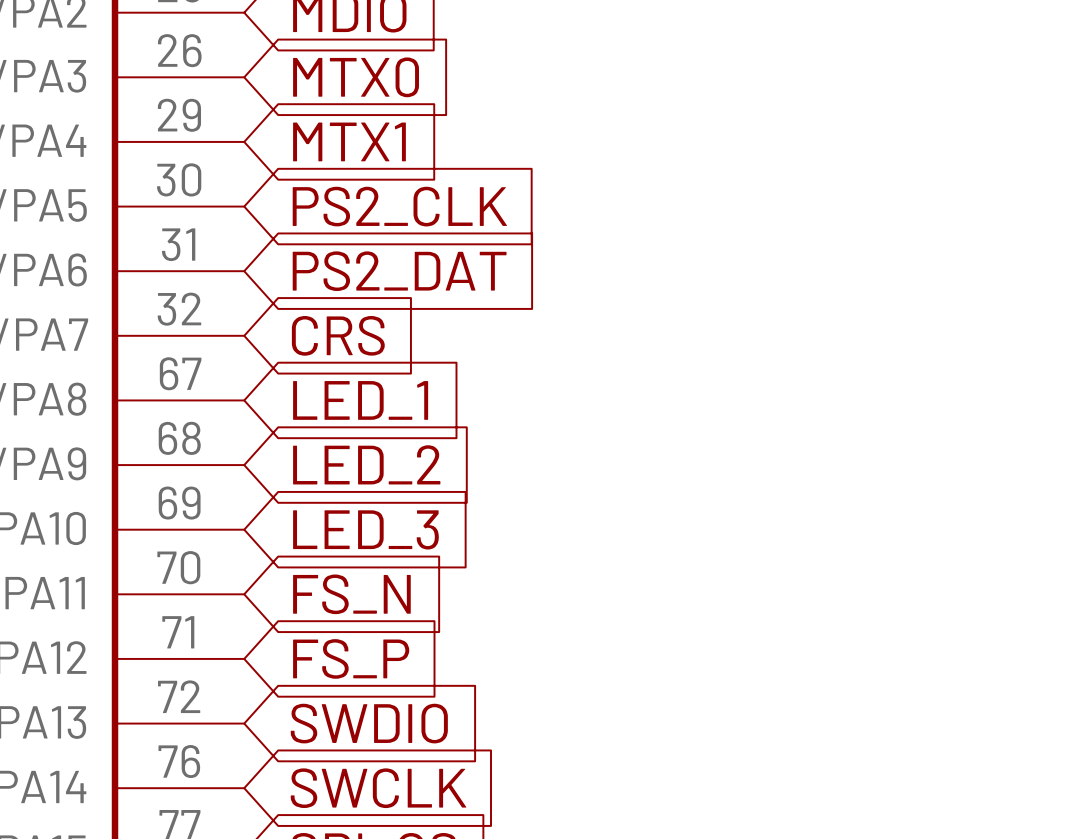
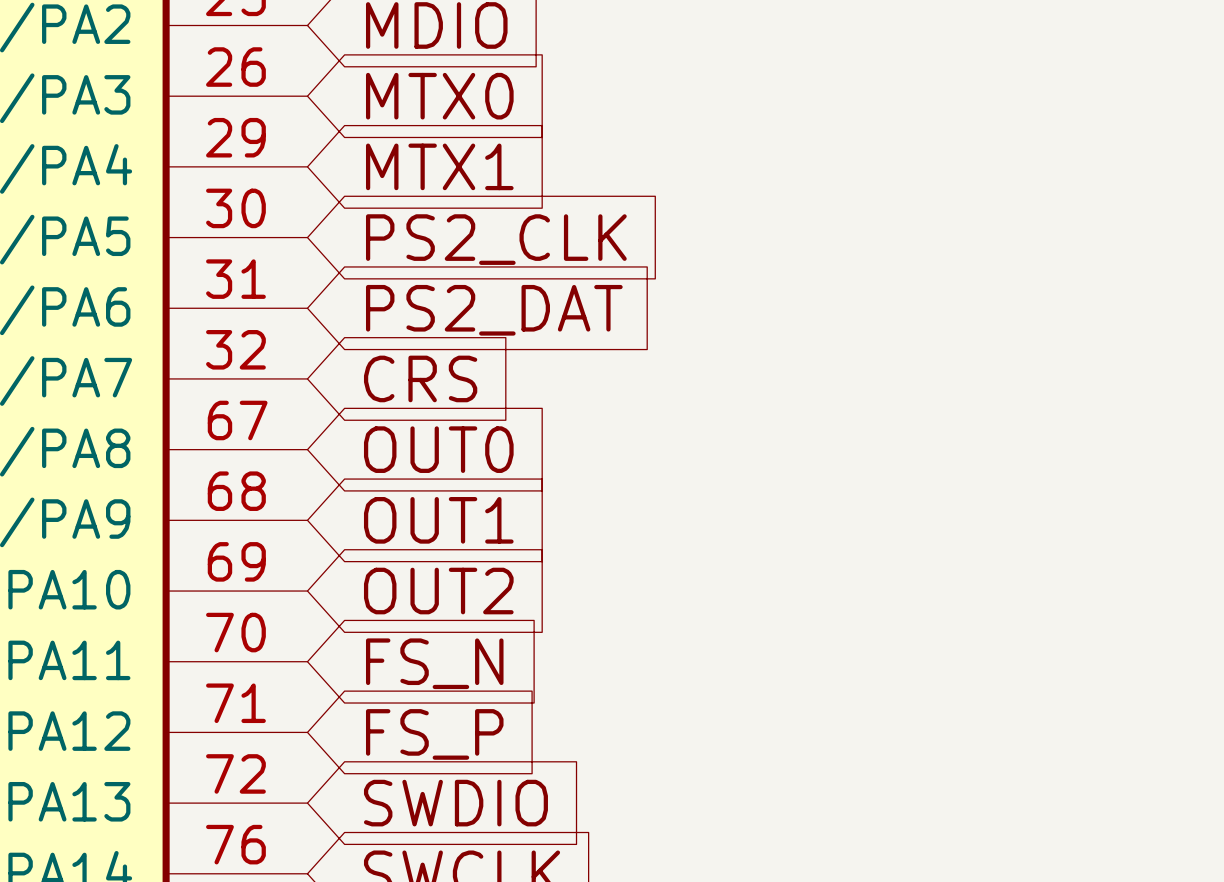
global label: LED_1 (360, 400) -> OUT0 (438, 449)
global label: LED_2 (366, 464) -> OUT1 (438, 520)
global label: LED_3 (365, 529) -> OUT2 (438, 591)

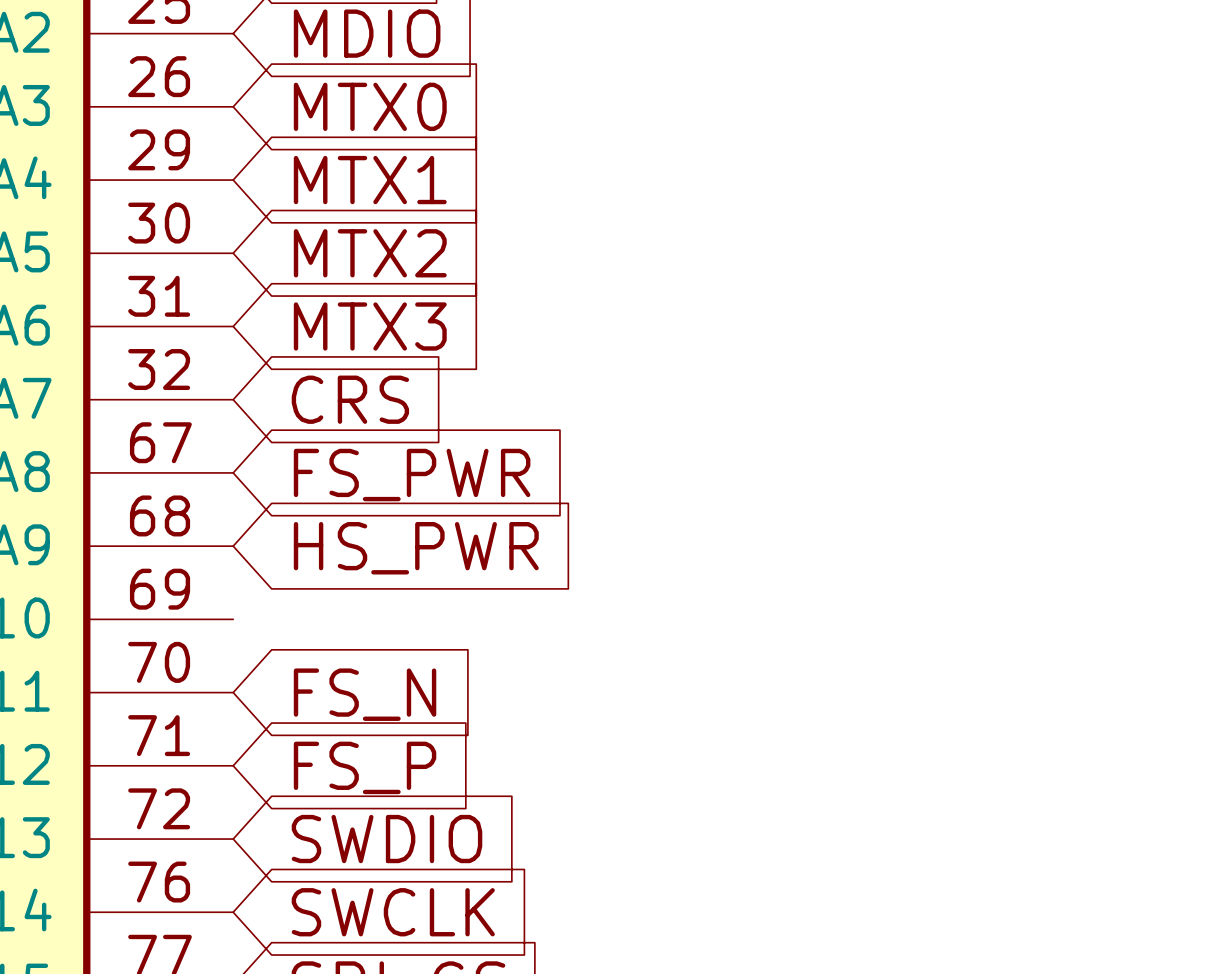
global label: PS2_CLK (496, 239) -> MTX2 (370, 253)
global label: PS2_DAT (494, 310) -> MTX3 (370, 326)
global label: OUT0 (438, 449) -> FS_PWR (412, 475)
global label: OUT1 (438, 520) -> HS_PWR (416, 548)
global label: OUT2 (438, 591) -> none

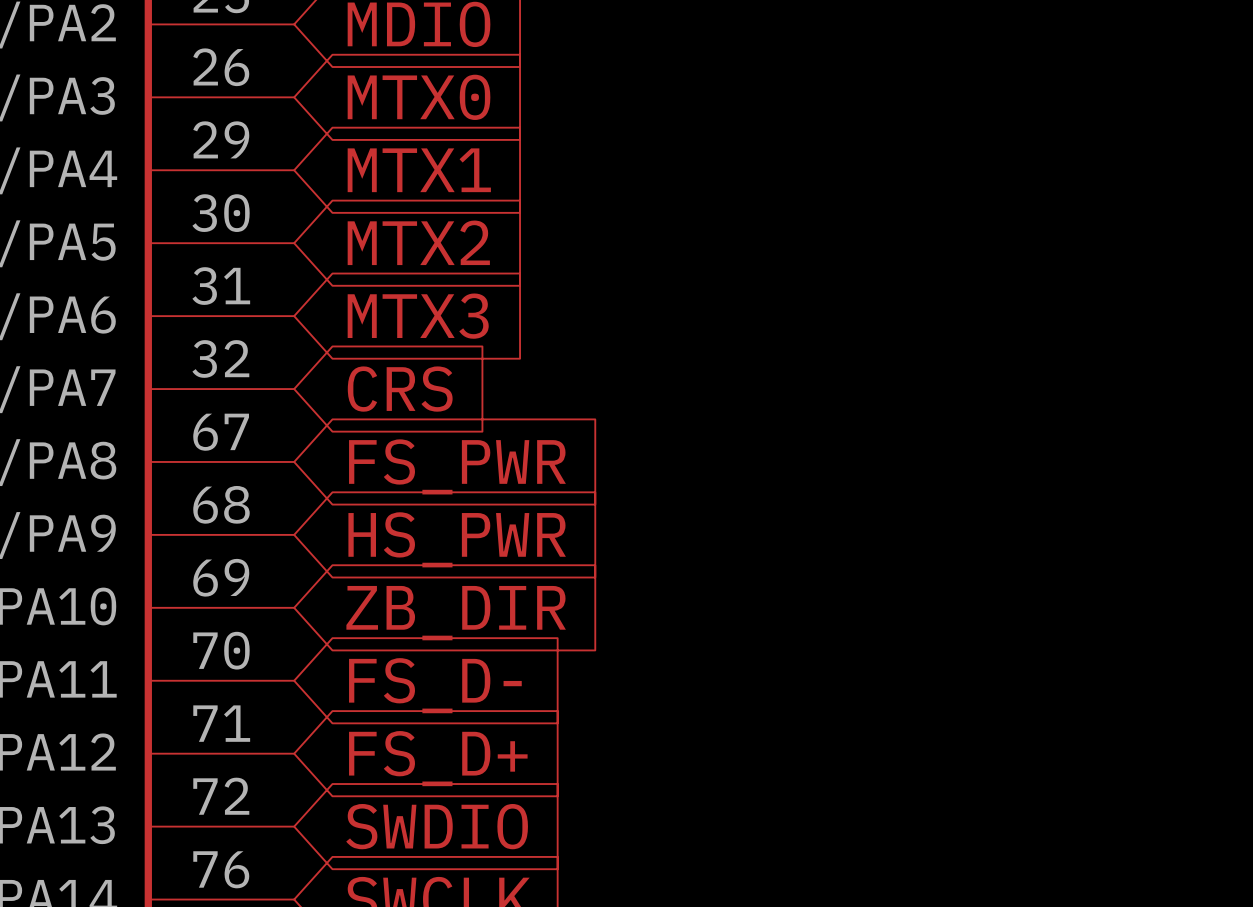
global label: none -> ZB_DIR (456, 613)
global label: FS_N (365, 694) -> FS_D- (435, 685)
global label: FS_P (365, 767) -> FS_D+ (438, 758)

